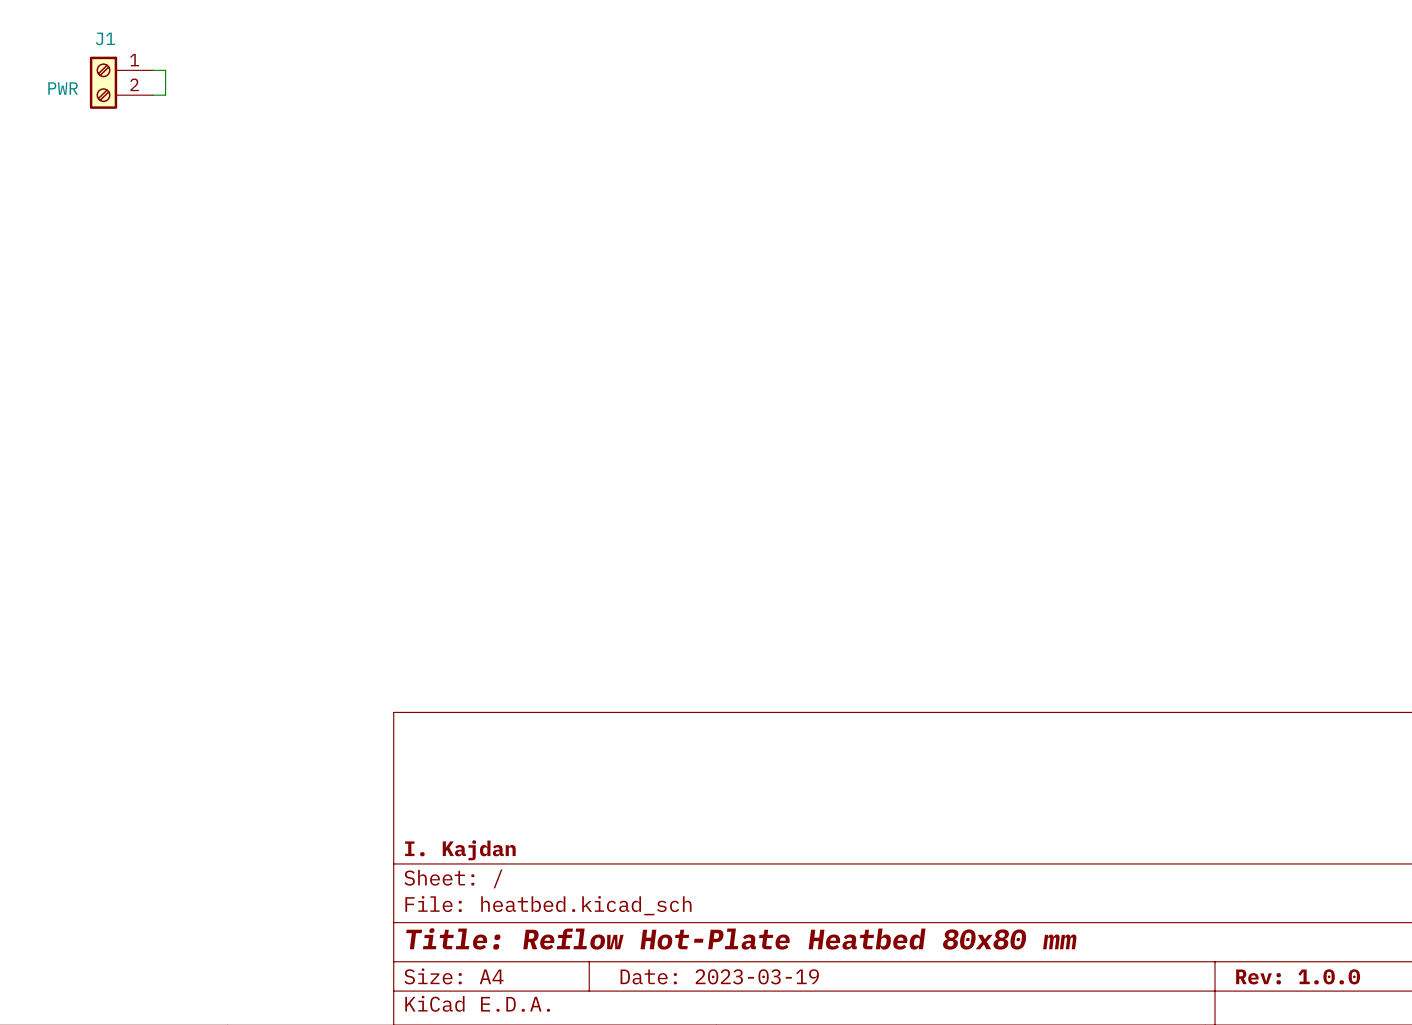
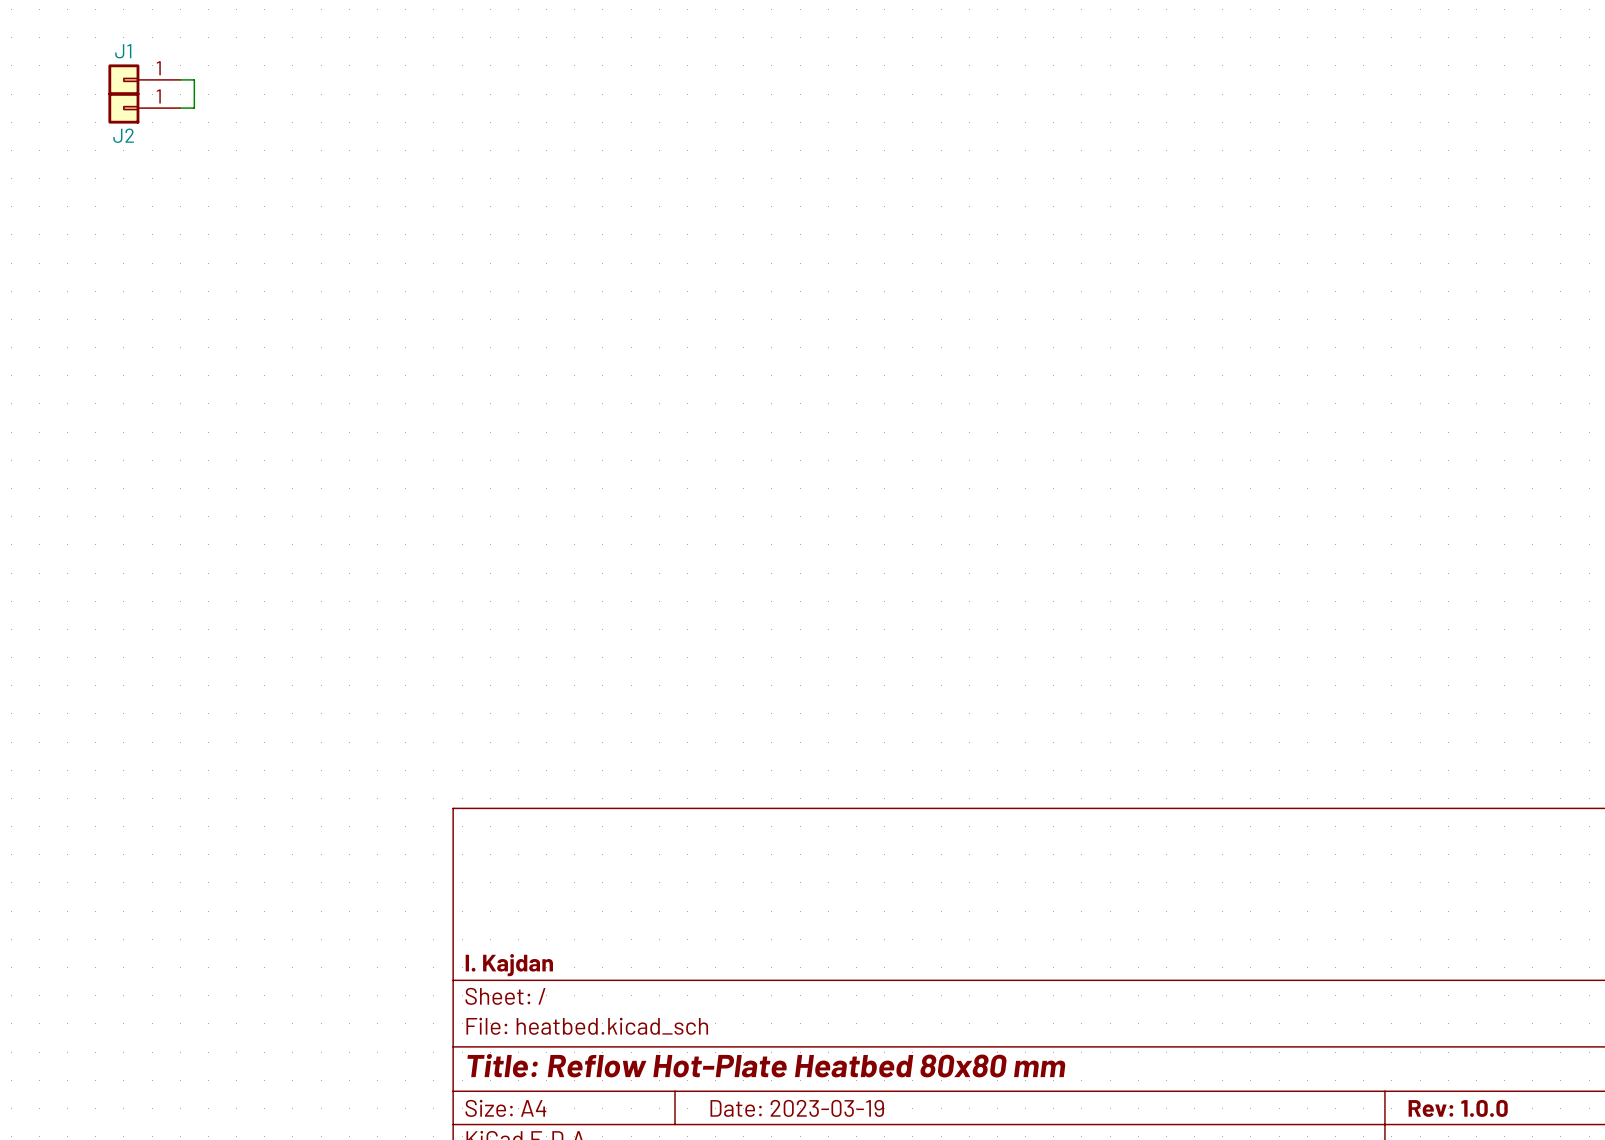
J1 symbol: [89, 56, 154, 109] -> [108, 64, 181, 96]
J1 value: PWR (63, 88) -> none
J2: none -> (144, 108)

